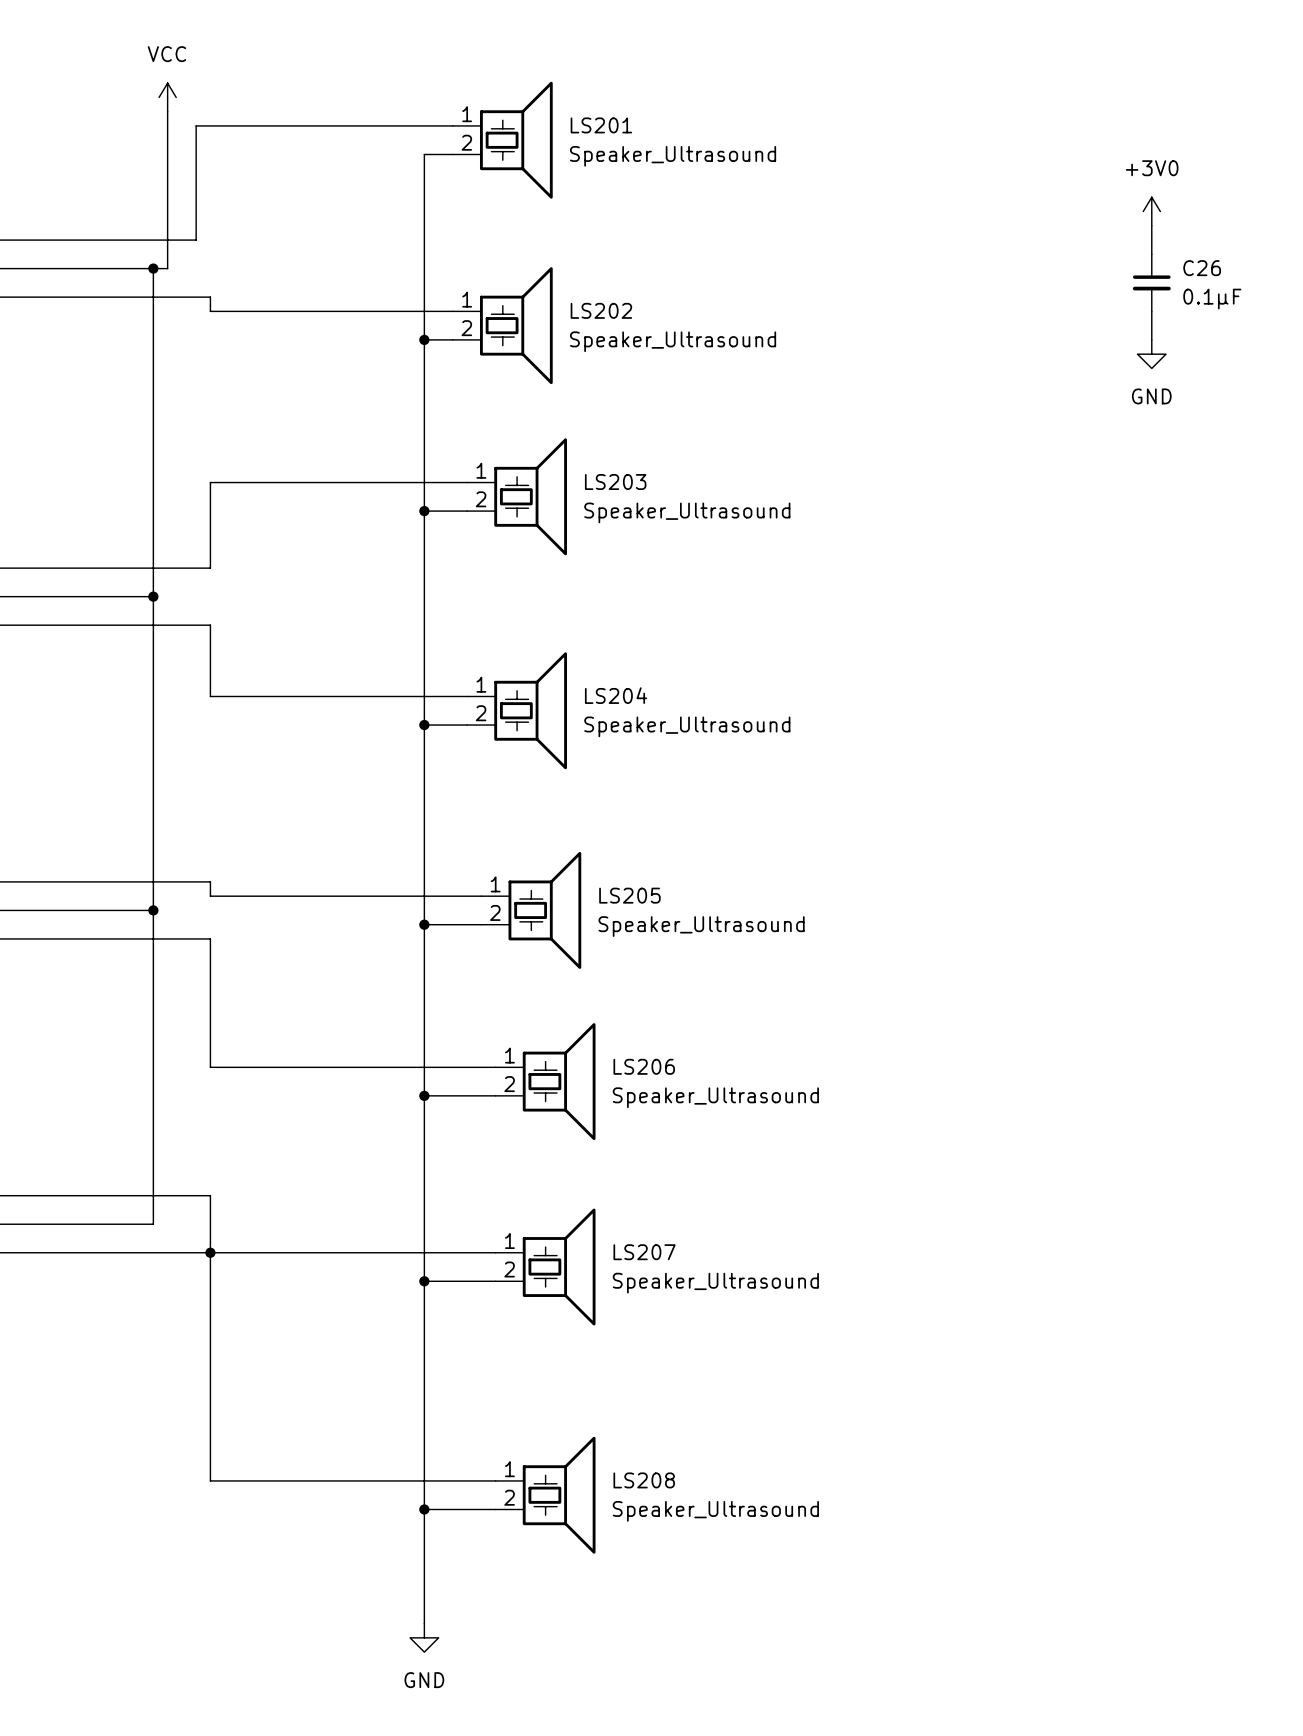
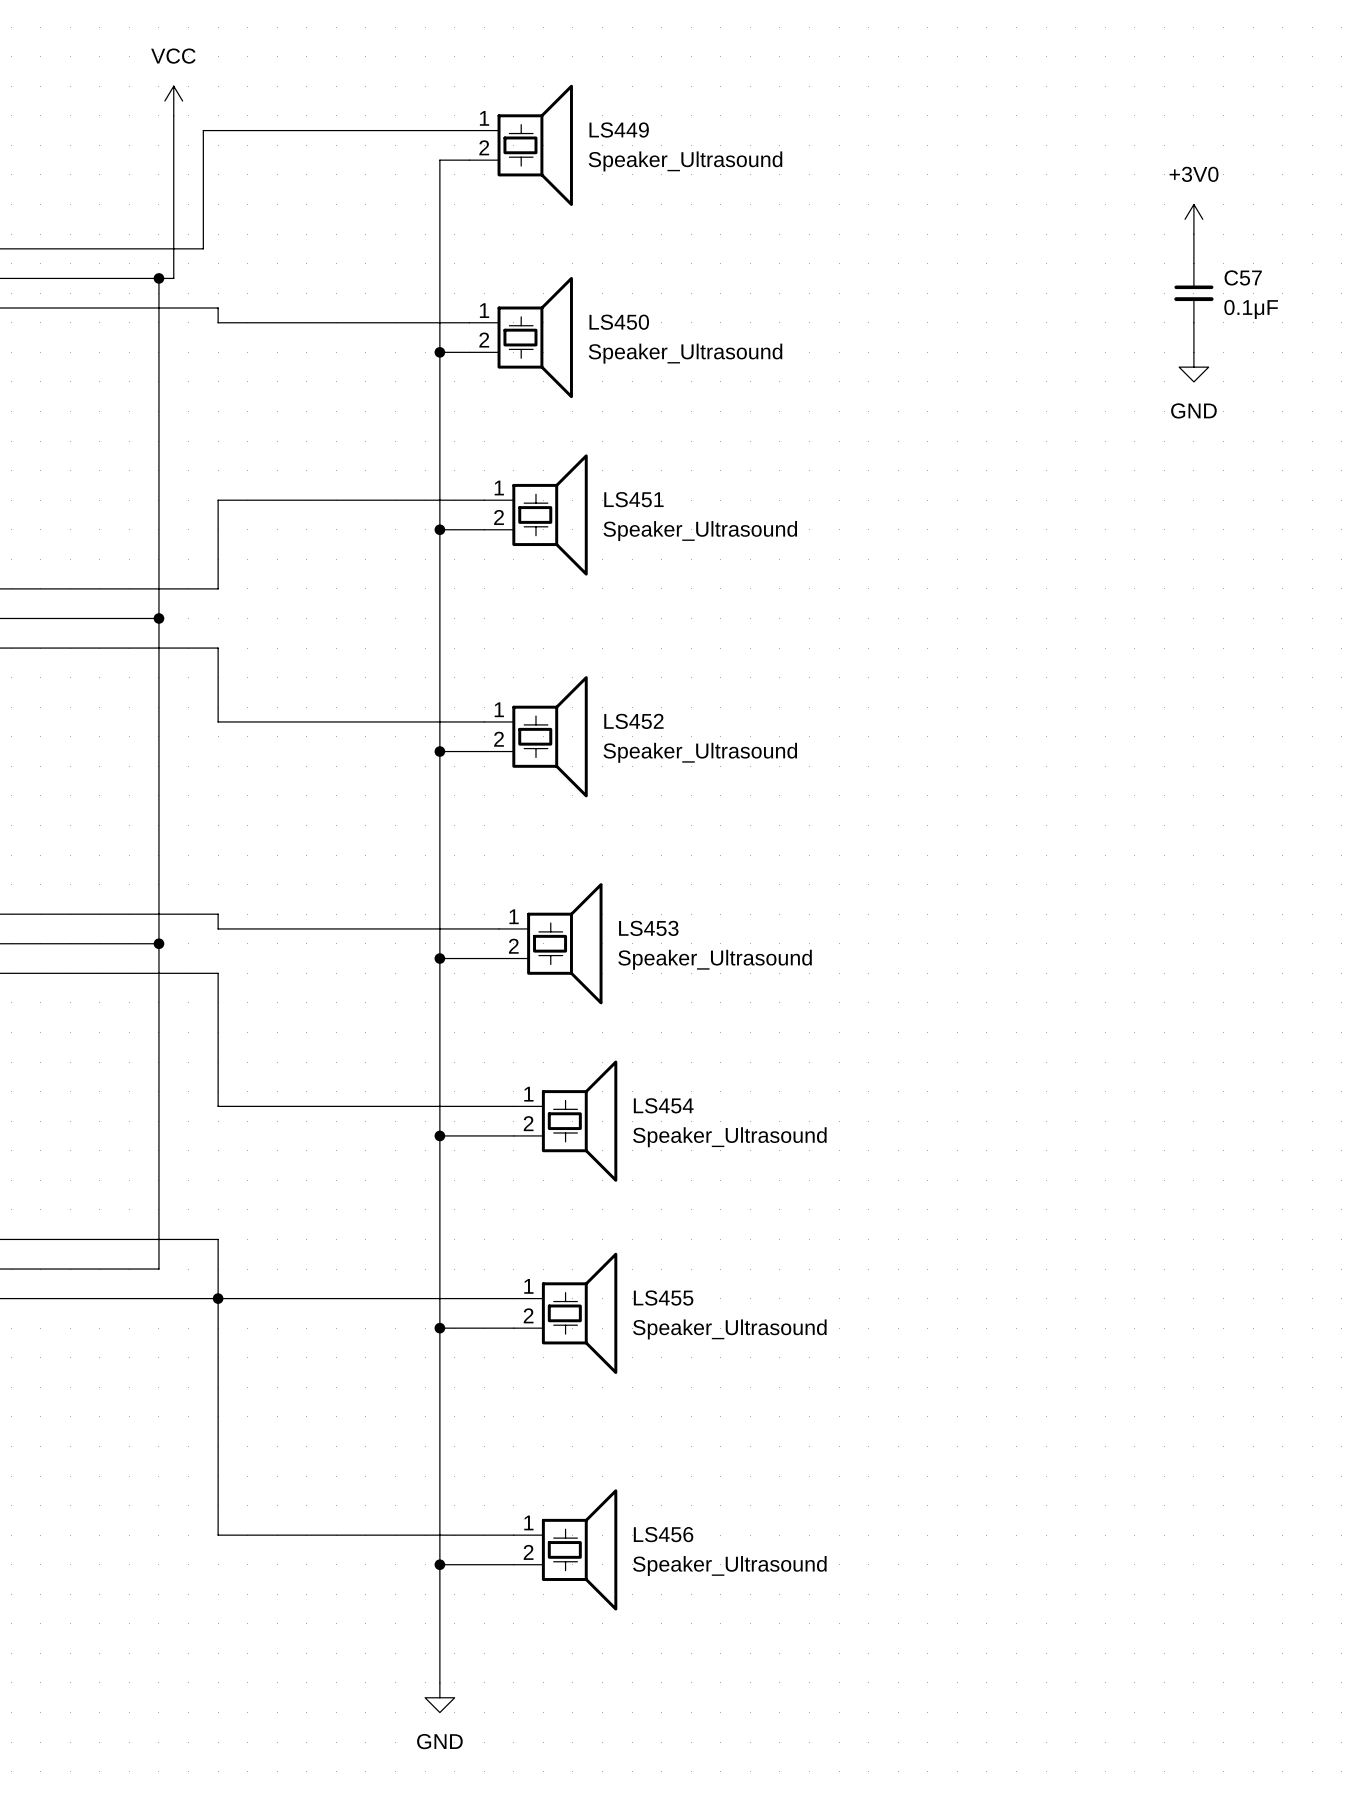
LS201 name: LS201 (601, 125) -> LS449 (619, 130)
C26 name: C26 (1202, 268) -> C57 (1243, 277)
LS202 name: LS202 (601, 310) -> LS450 (619, 322)
LS203 name: LS203 (615, 482) -> LS451 (633, 499)
LS204 name: LS204 (616, 695) -> LS452 (633, 721)
LS205 name: LS205 (629, 895) -> LS453 (648, 928)
LS206 name: LS206 (644, 1066) -> LS454 (663, 1105)
LS207 name: LS207 (644, 1252) -> LS455 (663, 1298)
LS208 name: LS208 (644, 1480) -> LS456 (663, 1534)

